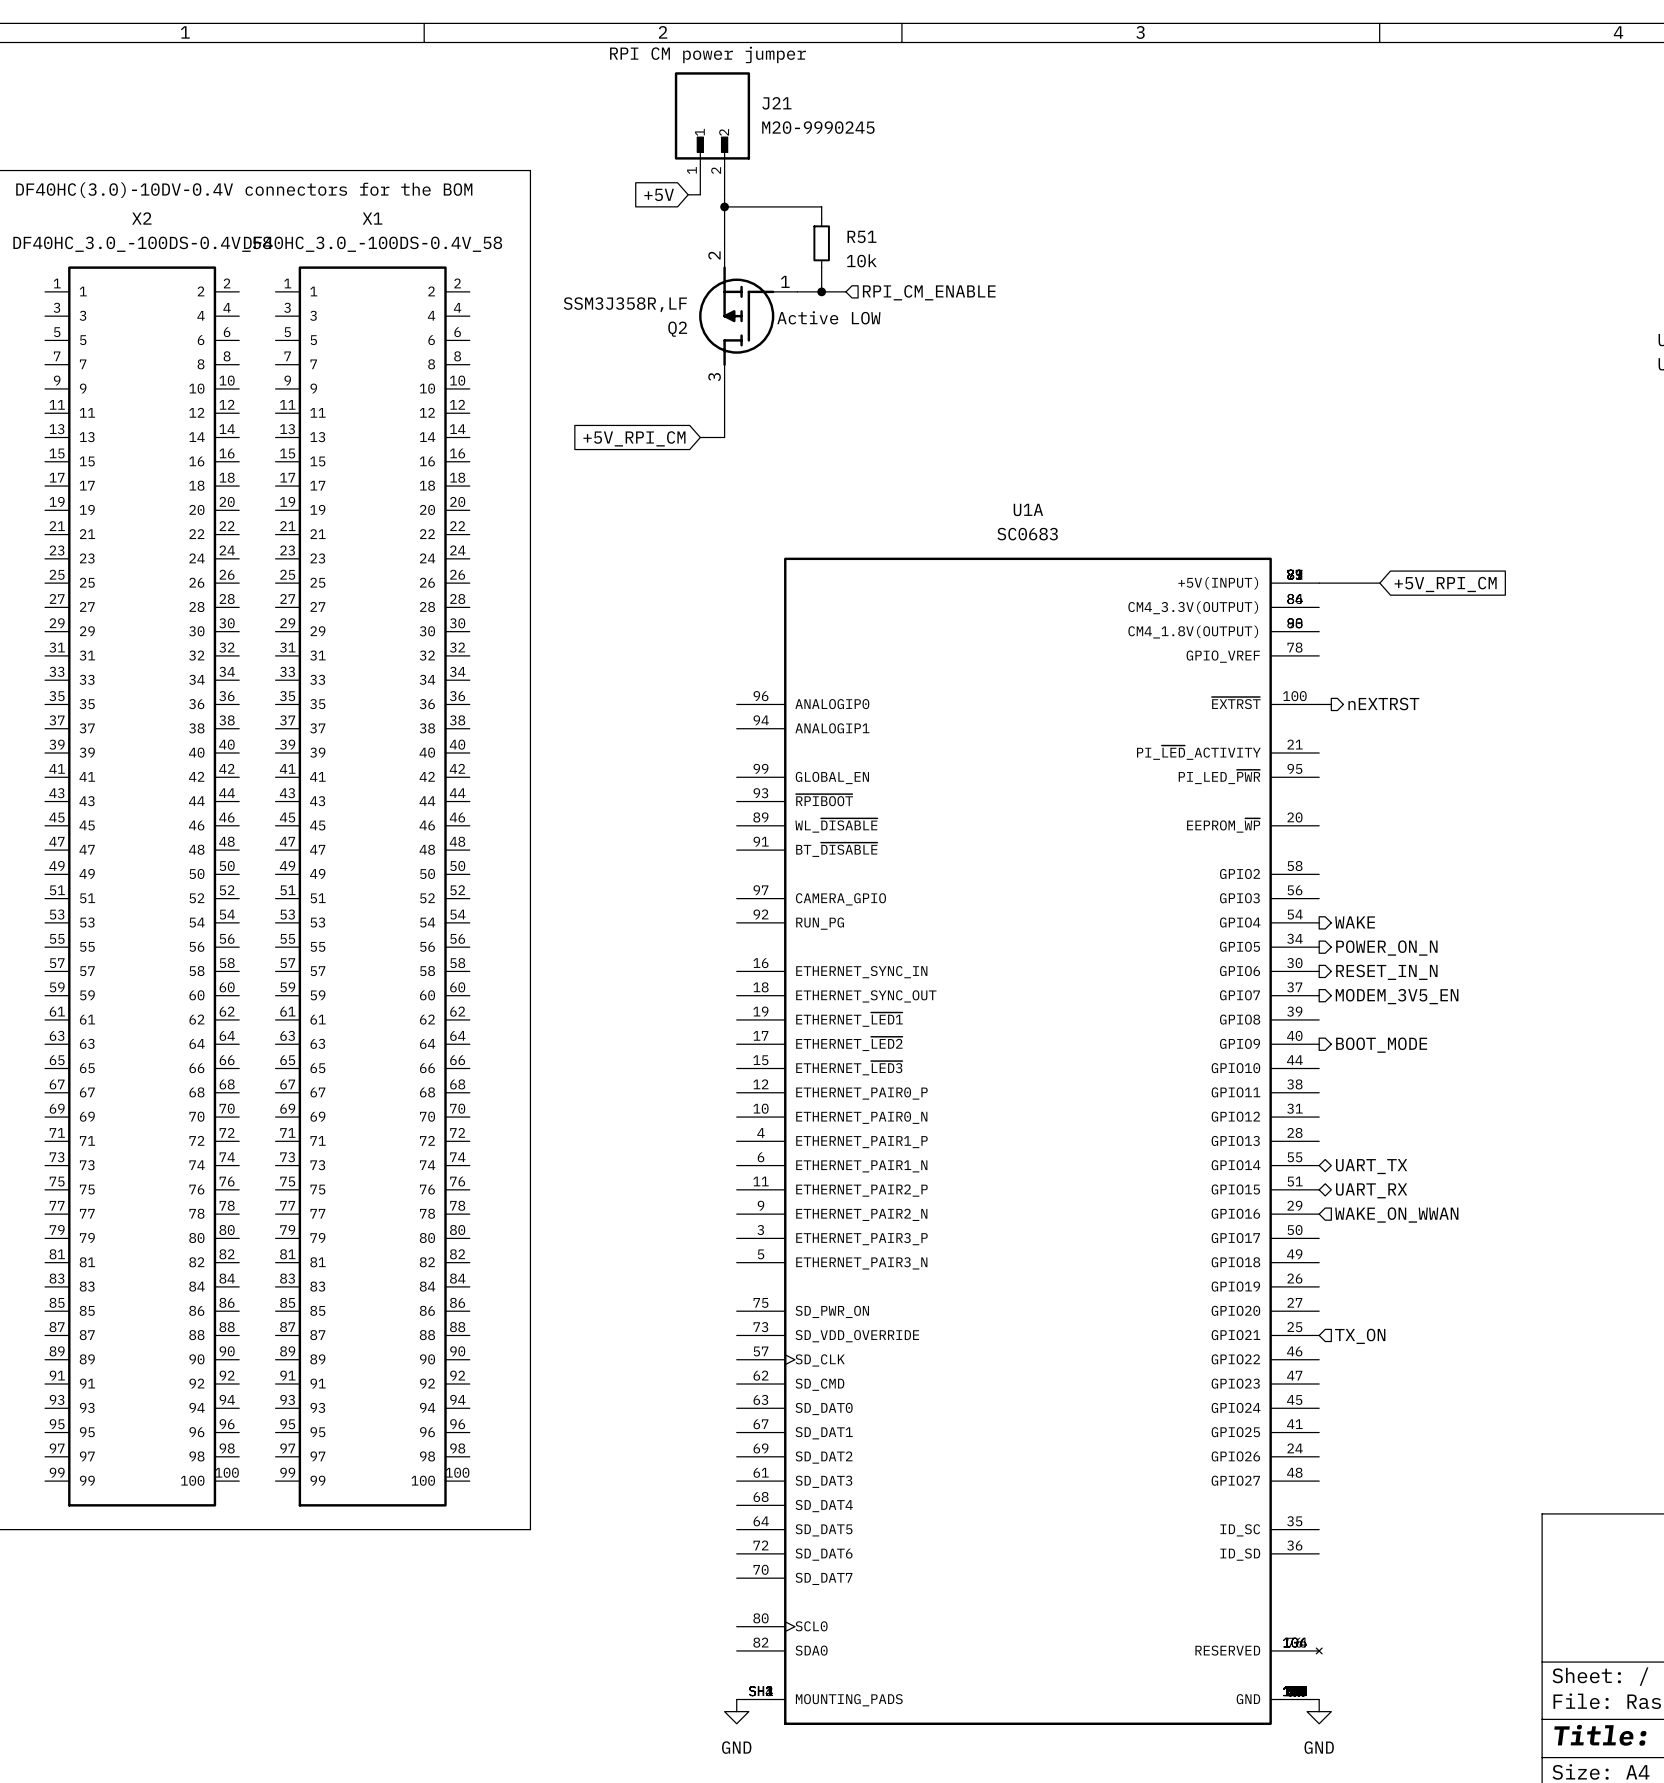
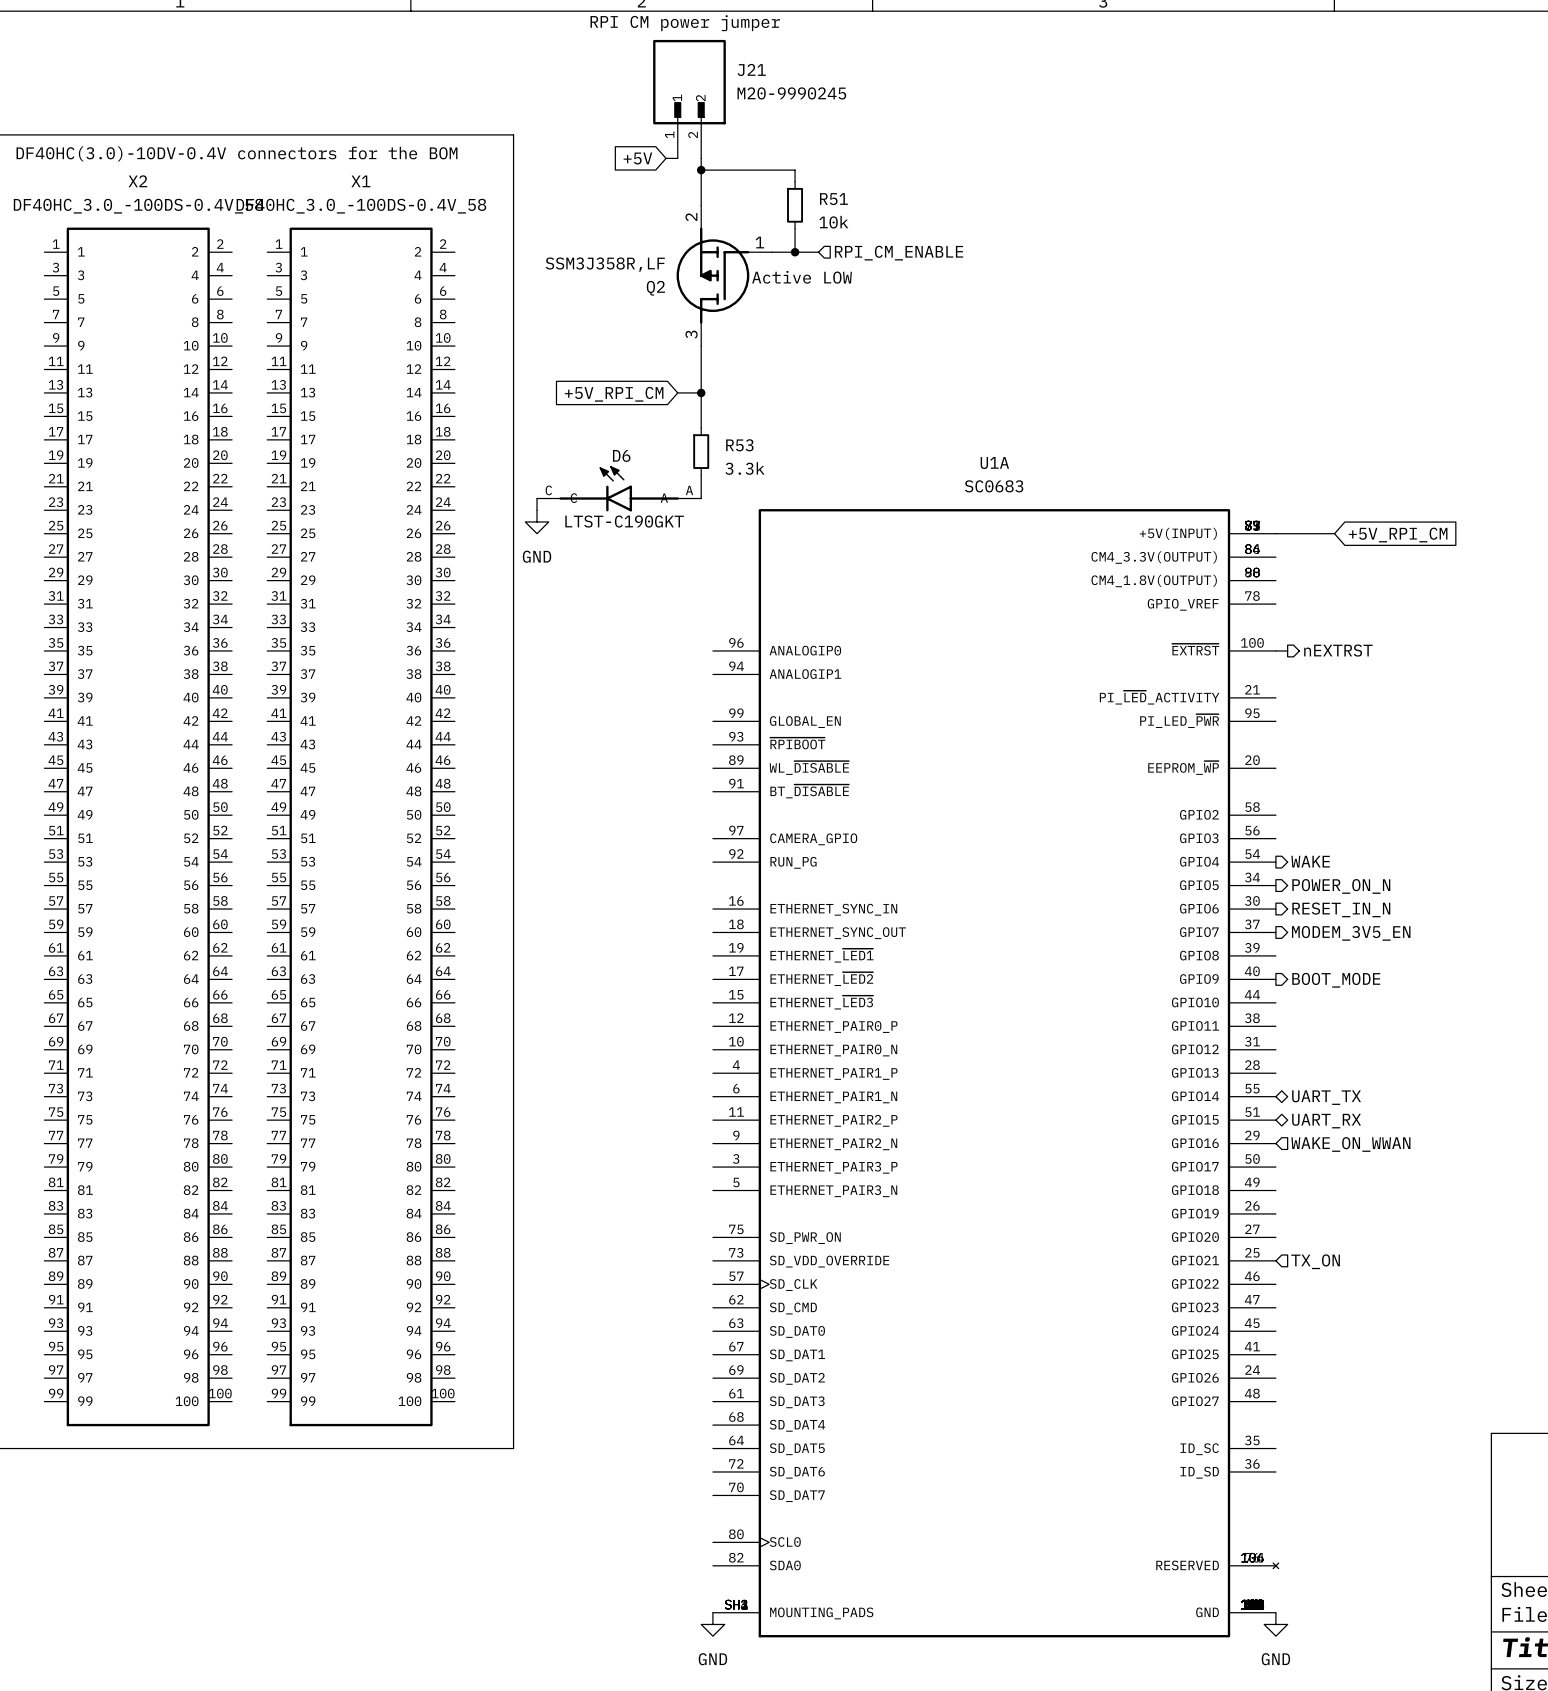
wire: none -> (701, 392) (701, 428)
junction: none -> (701, 392)
R53: none -> 3.3k (701, 451)
wire: none -> (701, 475) (701, 498)
D6: none -> LTST-C190GKT (619, 488)
wire: none -> (537, 498) (537, 510)
power symbol: none -> GND (537, 521)

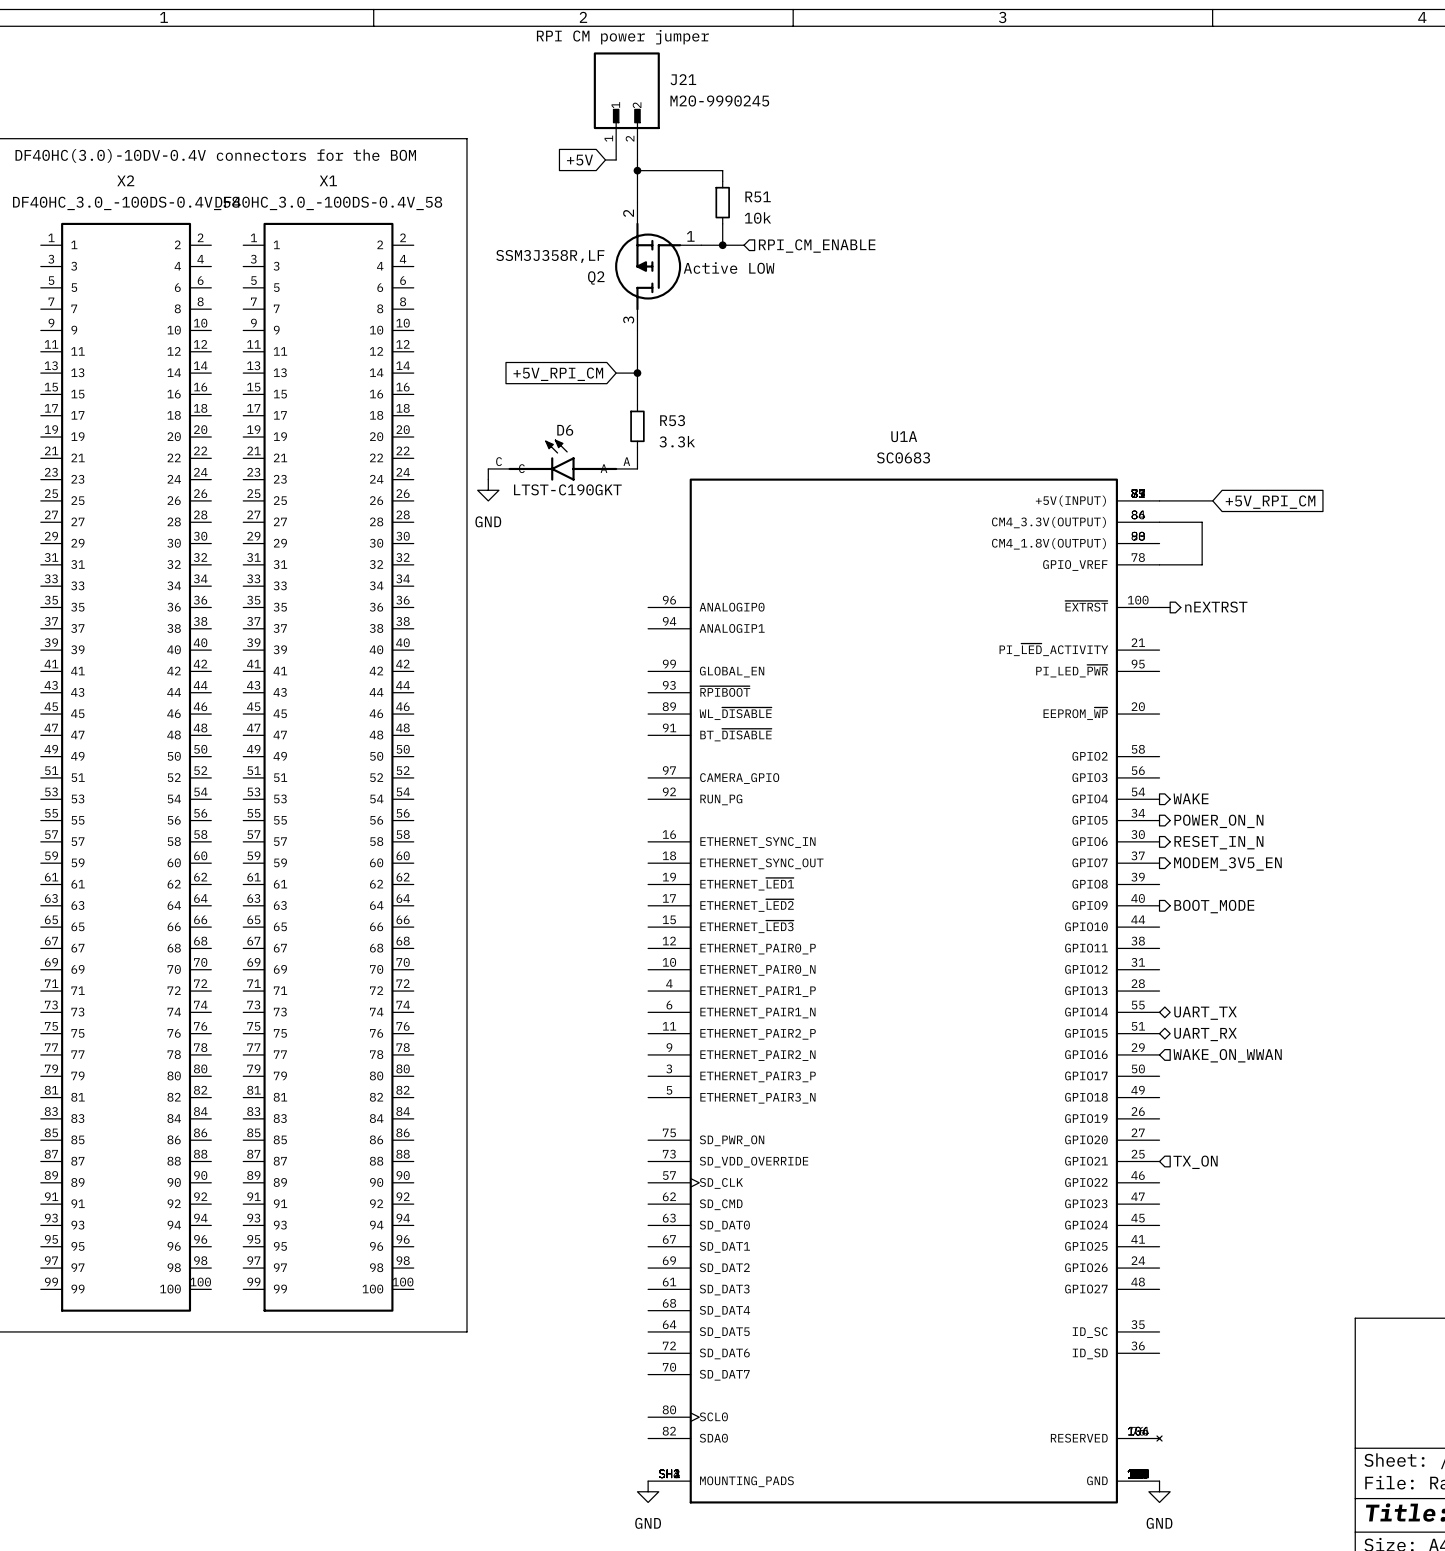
wire: none -> (1159, 522) (1202, 522) (1202, 564) (1159, 564)

